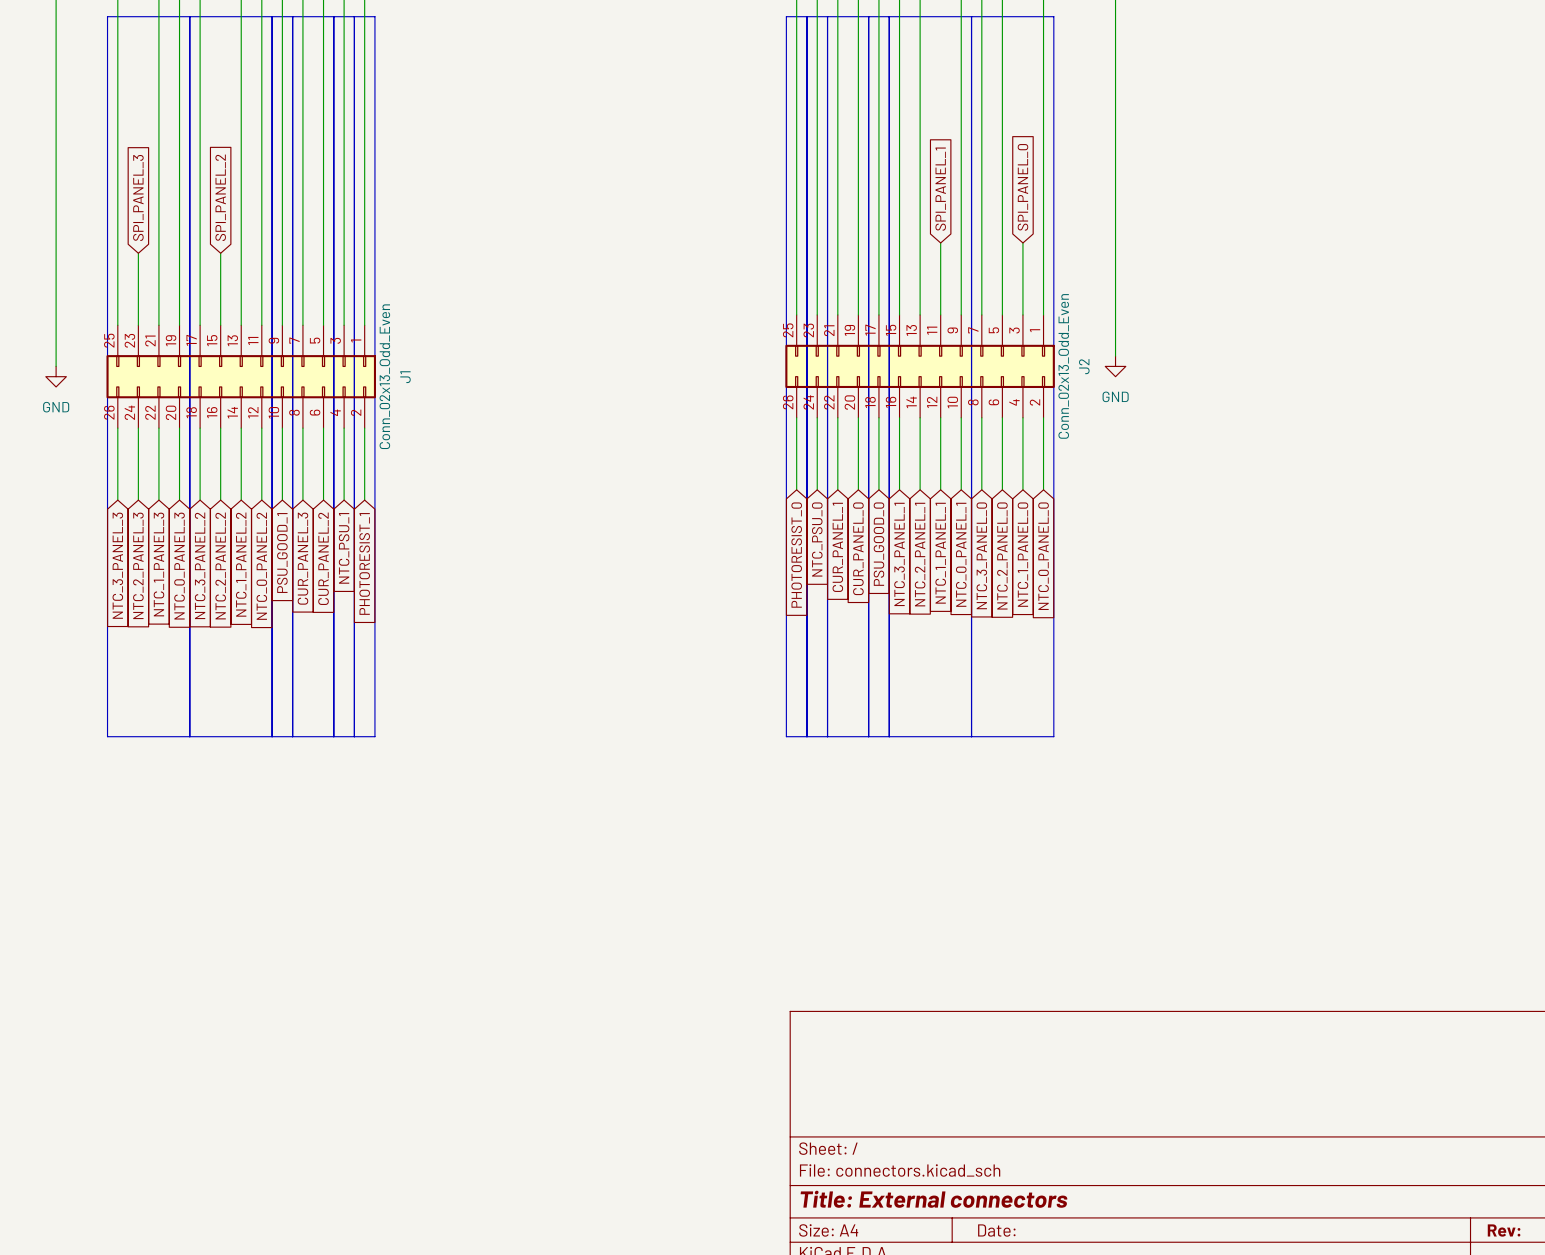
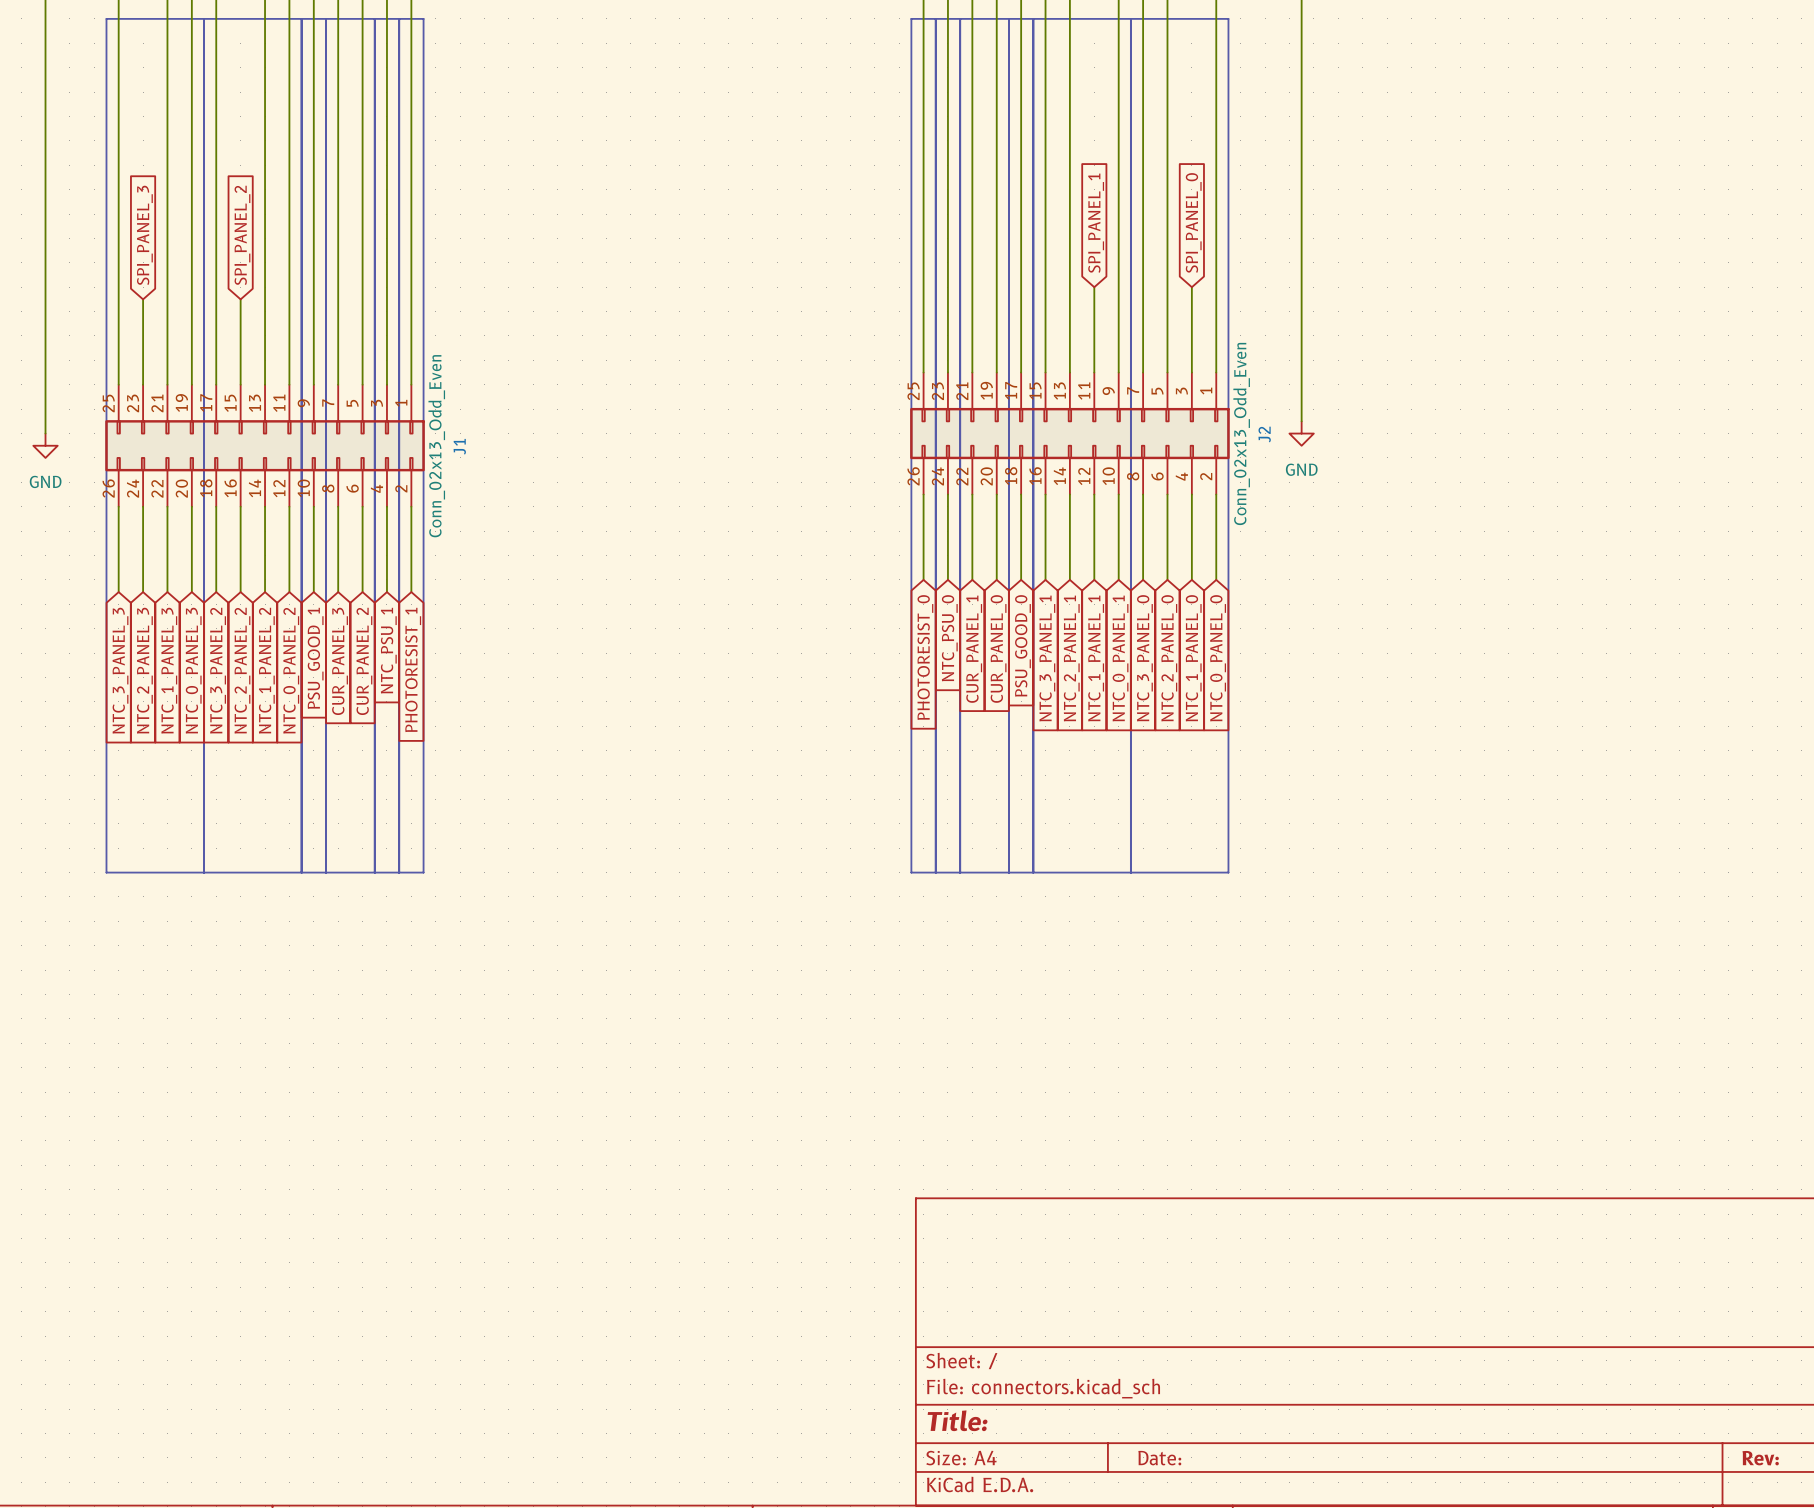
title block: Title: External connectors (934, 1199) -> Title: (957, 1420)

